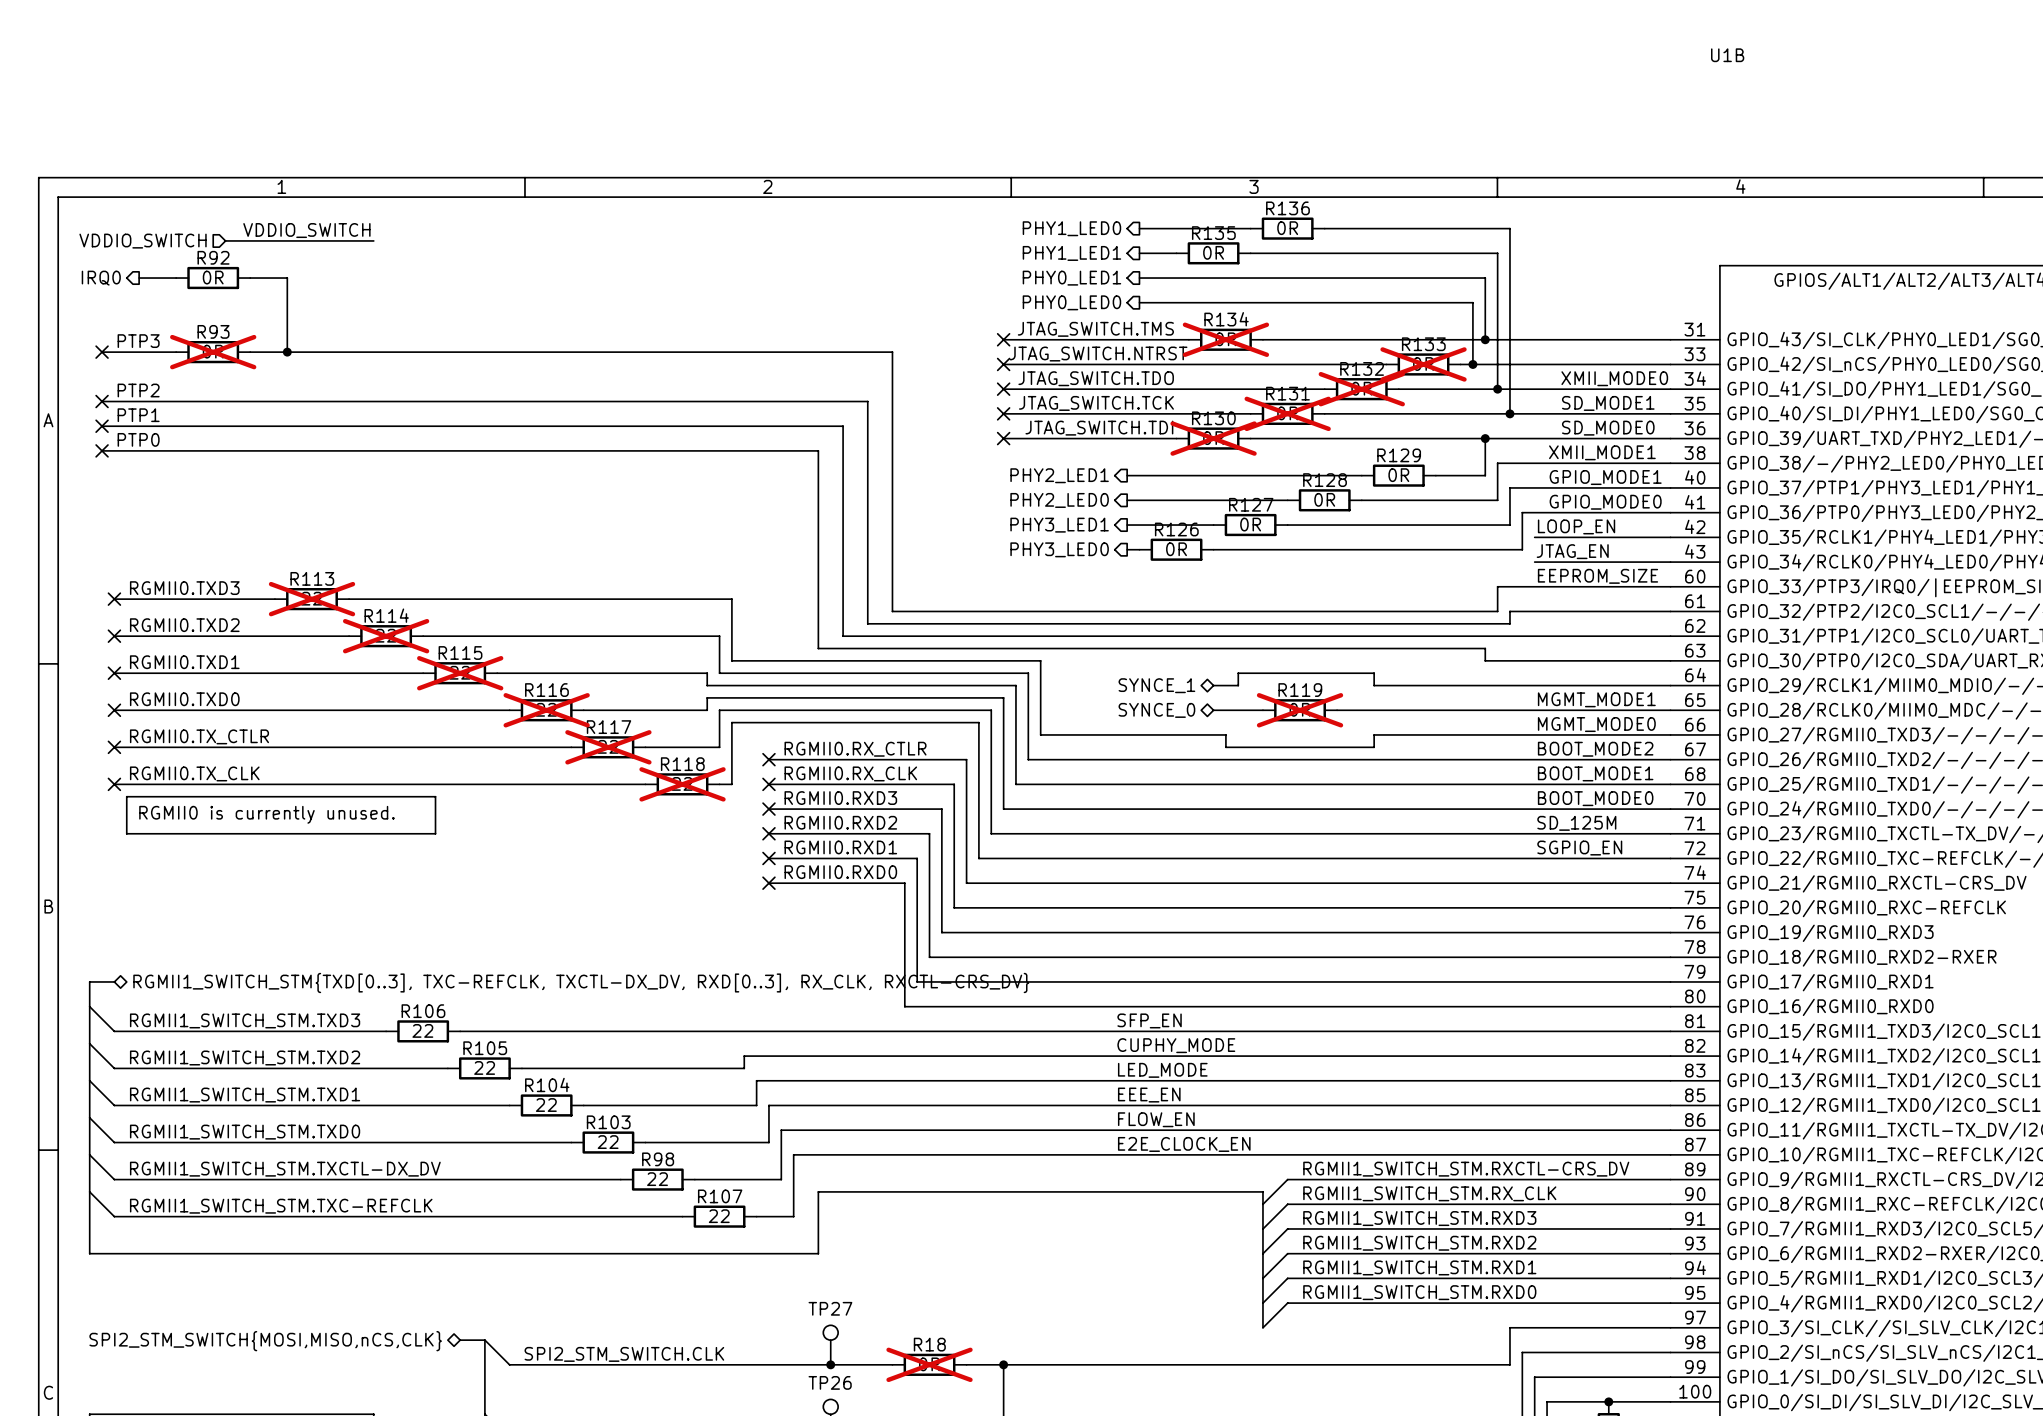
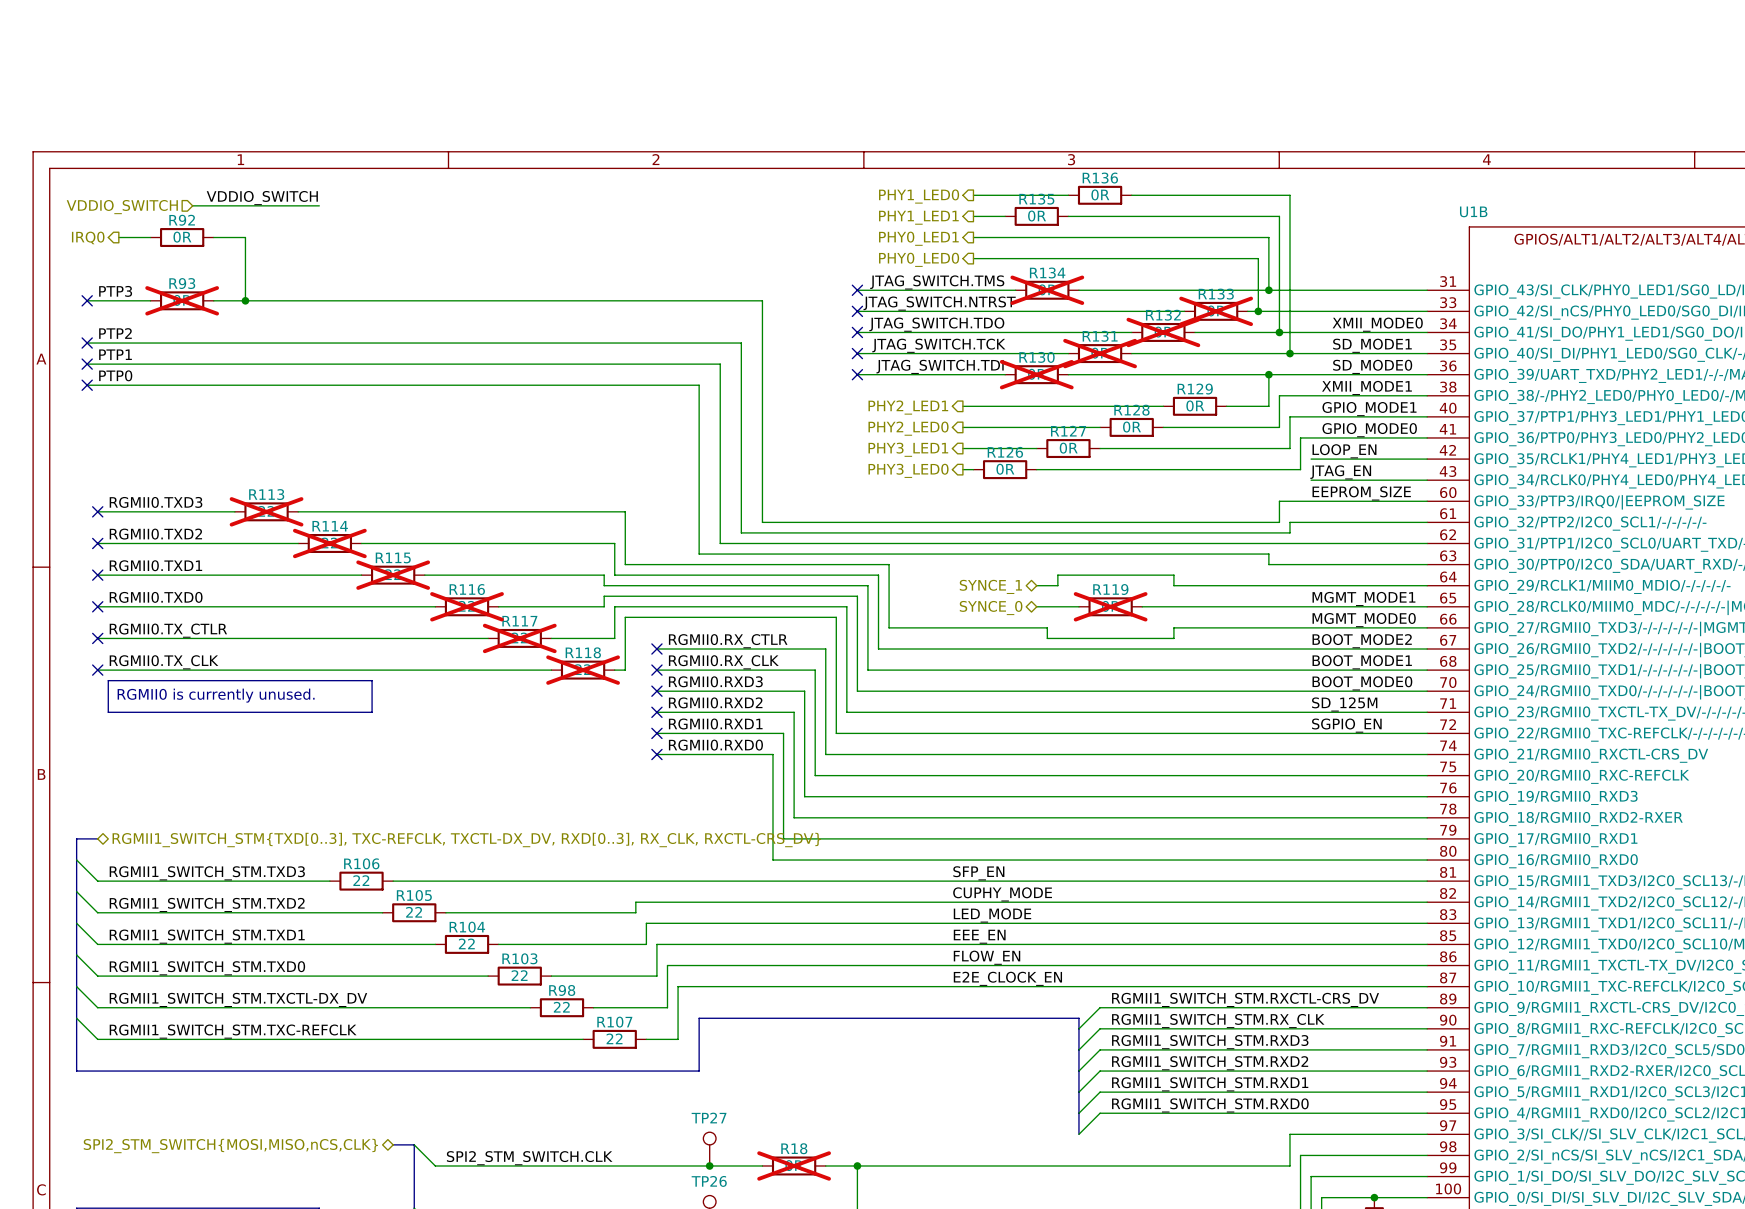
U1B name position: U1B (1727, 55) -> U1B (1473, 211)

